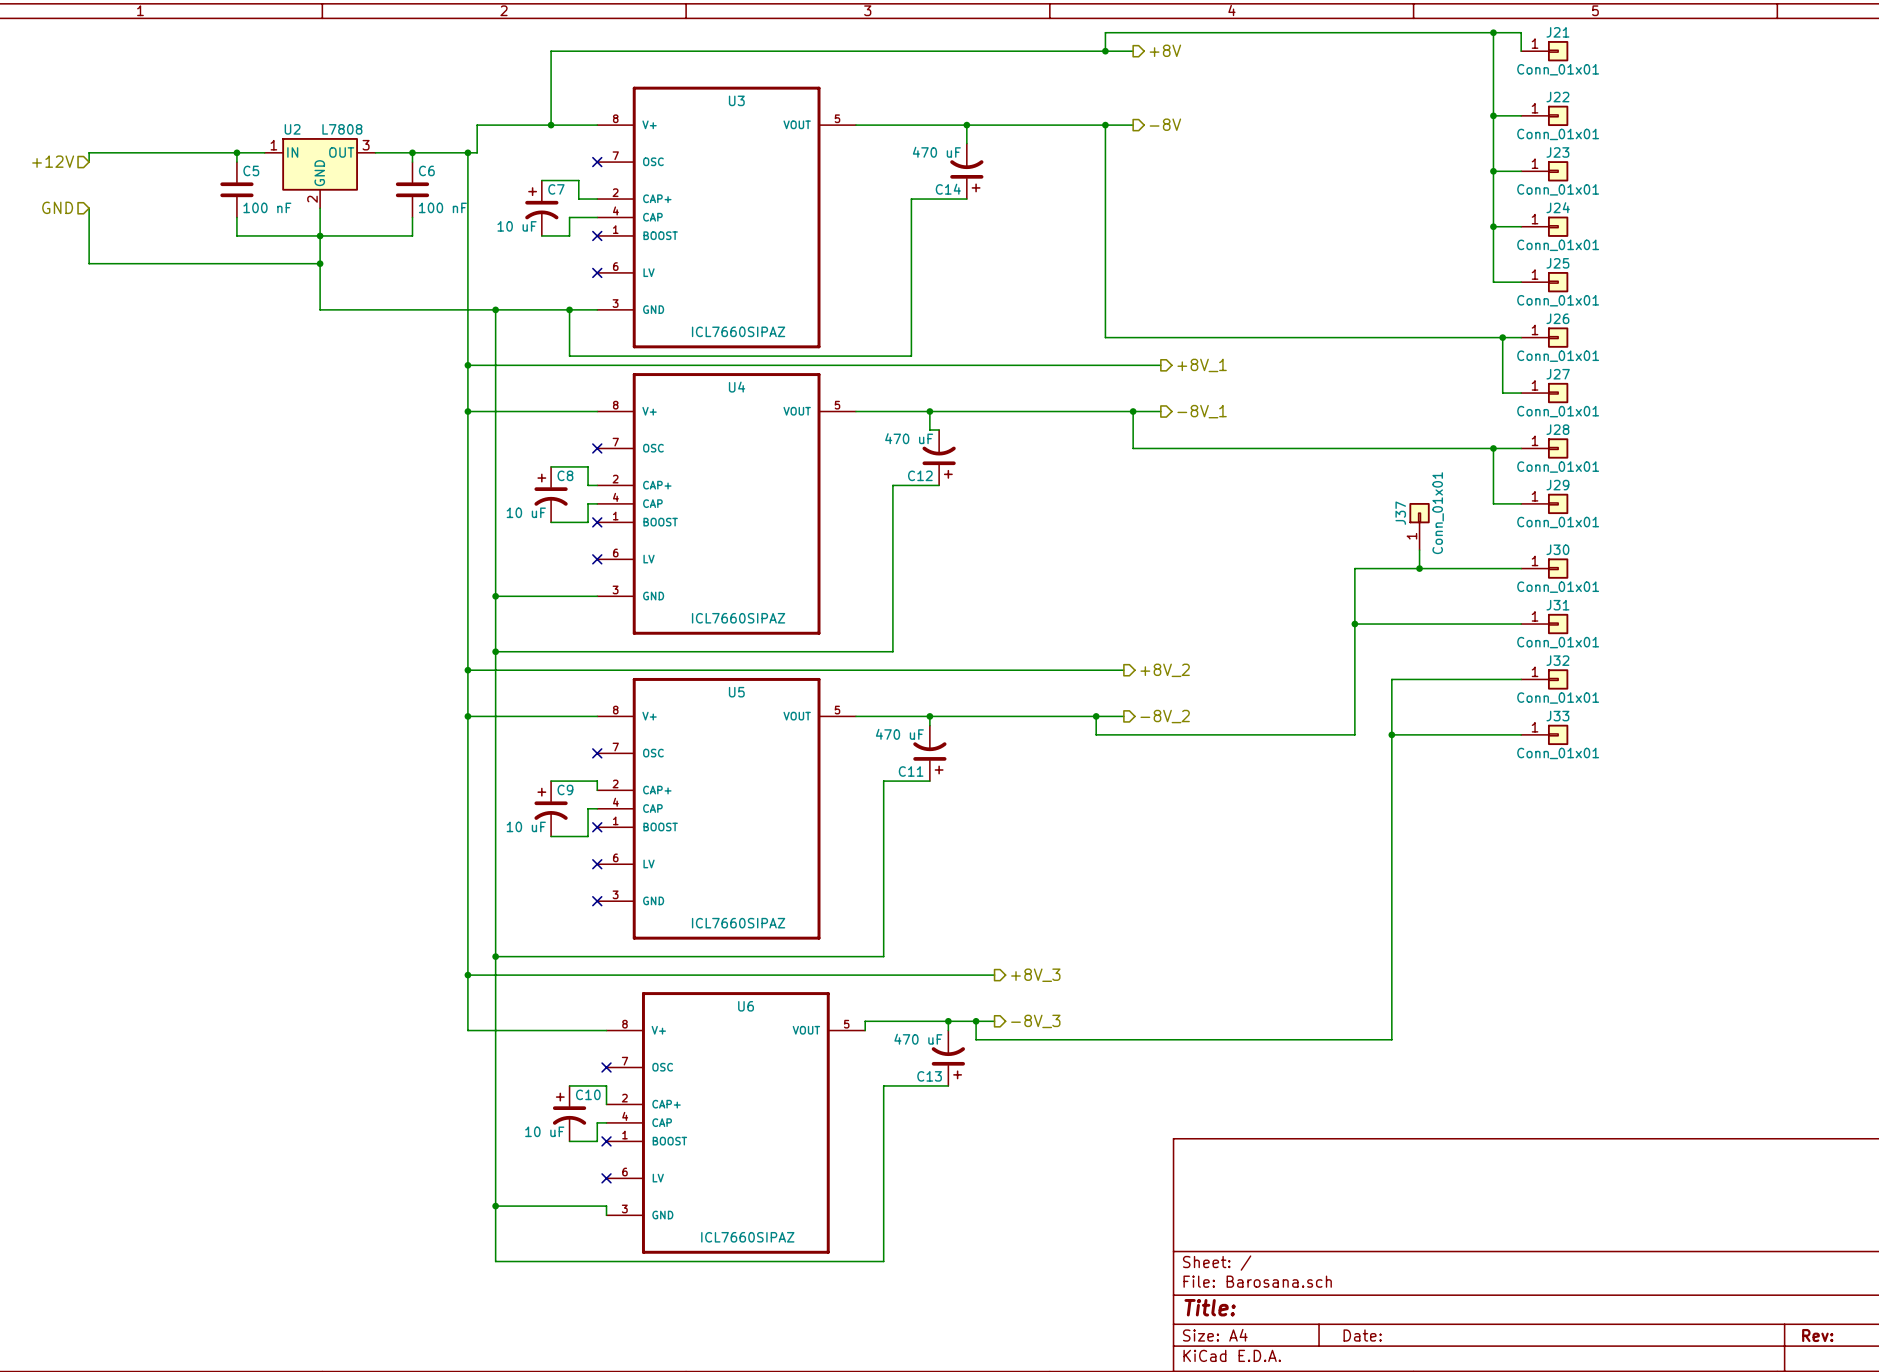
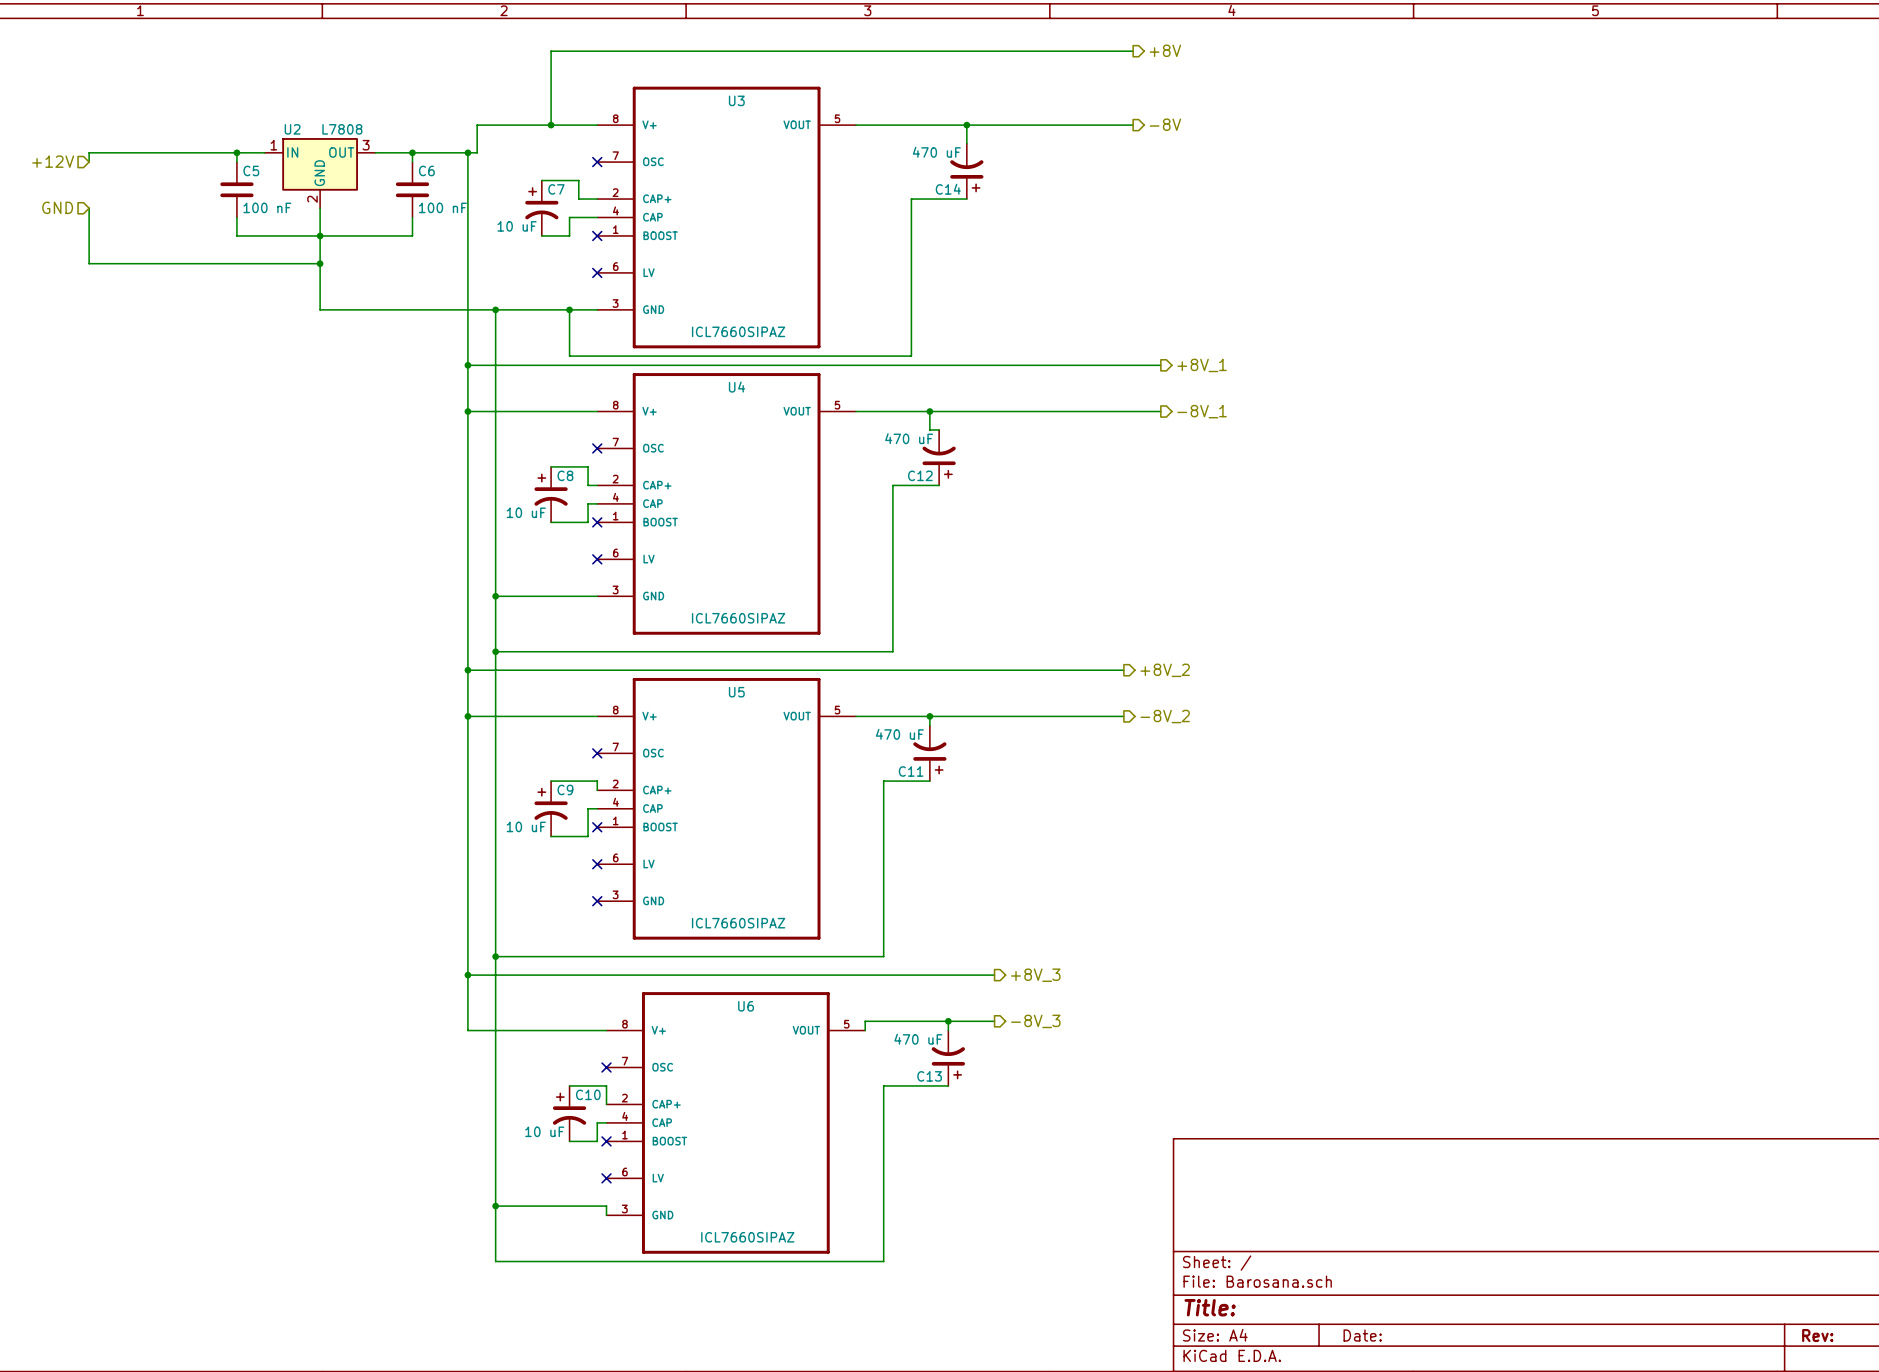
wire: (1493, 32) (1493, 282) (1521, 282) -> none
junction: (1493, 32) -> none
wire: (1105, 51) (1105, 32) (1521, 32) (1521, 51) -> none
junction: (1105, 51) -> none
J21: Conn_01x01 (1544, 51) -> none
wire: (1493, 115) (1521, 115) -> none
junction: (1493, 115) -> none
J22: Conn_01x01 (1544, 115) -> none
wire: (1105, 125) (1105, 337) (1521, 337) -> none
junction: (1105, 125) -> none
wire: (1493, 171) (1521, 171) -> none
junction: (1493, 171) -> none
J23: Conn_01x01 (1544, 171) -> none
wire: (1493, 226) (1521, 226) -> none
junction: (1493, 226) -> none
J24: Conn_01x01 (1544, 226) -> none
J25: Conn_01x01 (1544, 282) -> none
wire: (1502, 337) (1502, 393) (1521, 393) -> none
junction: (1502, 337) -> none
J26: Conn_01x01 (1544, 337) -> none
J27: Conn_01x01 (1544, 393) -> none
wire: (1133, 411) (1133, 448) (1521, 448) -> none
junction: (1133, 411) -> none
wire: (1493, 448) (1493, 503) (1521, 503) -> none
junction: (1493, 448) -> none
J28: Conn_01x01 (1544, 448) -> none
J29: Conn_01x01 (1544, 503) -> none
J37: Conn_01x01 (1419, 526) -> none
wire: (1419, 550) (1419, 568) -> none
junction: (1419, 568) -> none
wire: (1521, 568) (1354, 568) (1354, 734) (1096, 734) (1096, 716) -> none
J30: Conn_01x01 (1544, 568) -> none
wire: (1354, 624) (1521, 624) -> none
junction: (1354, 624) -> none
J31: Conn_01x01 (1544, 624) -> none
wire: (1521, 679) (1391, 679) (1391, 1039) (976, 1039) (976, 1021) -> none
J32: Conn_01x01 (1544, 679) -> none
junction: (1096, 716) -> none
wire: (1391, 734) (1521, 734) -> none
junction: (1391, 734) -> none
J33: Conn_01x01 (1544, 734) -> none
junction: (976, 1021) -> none

